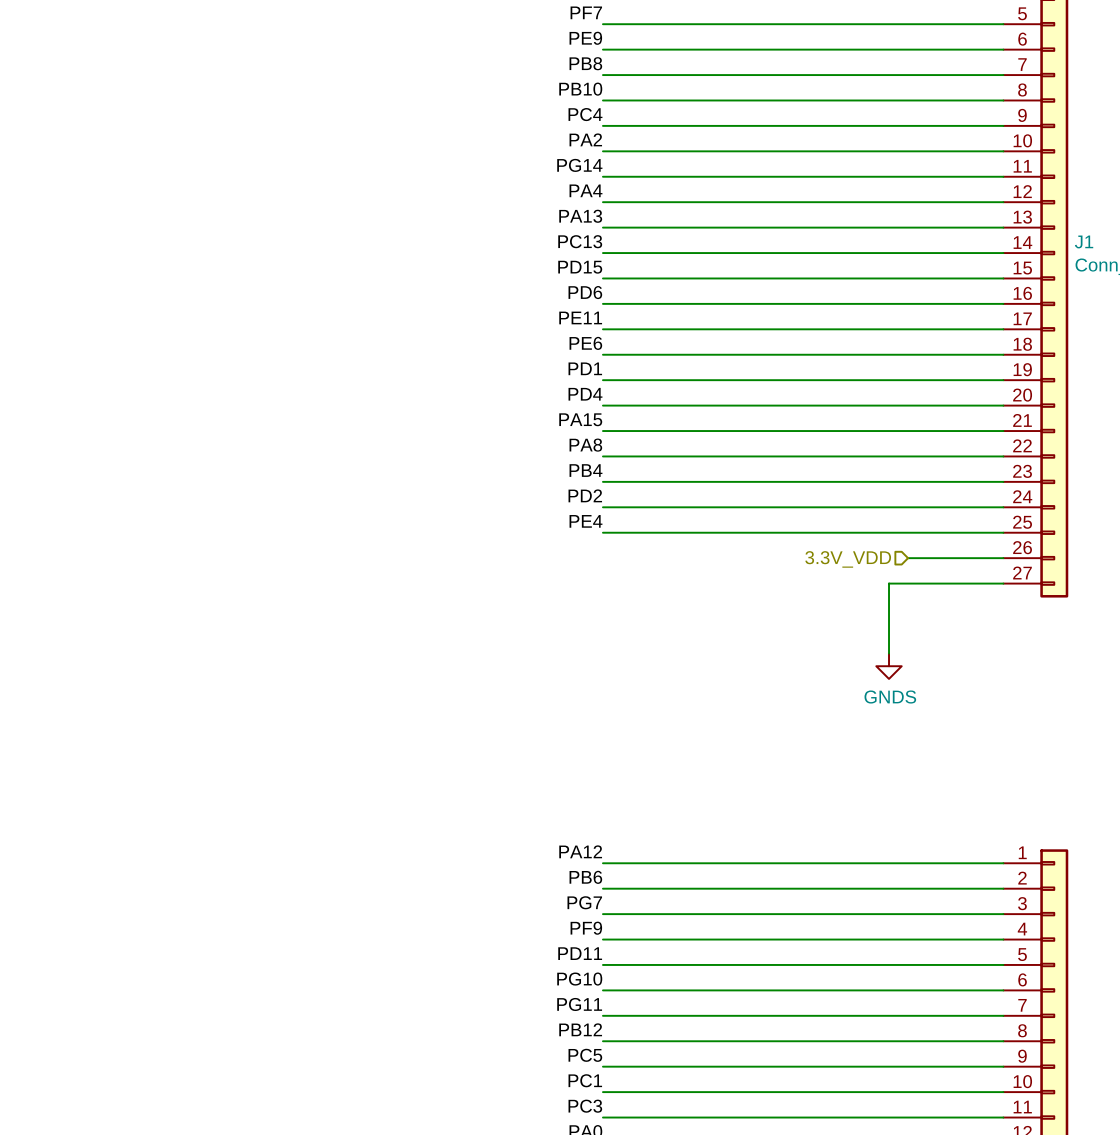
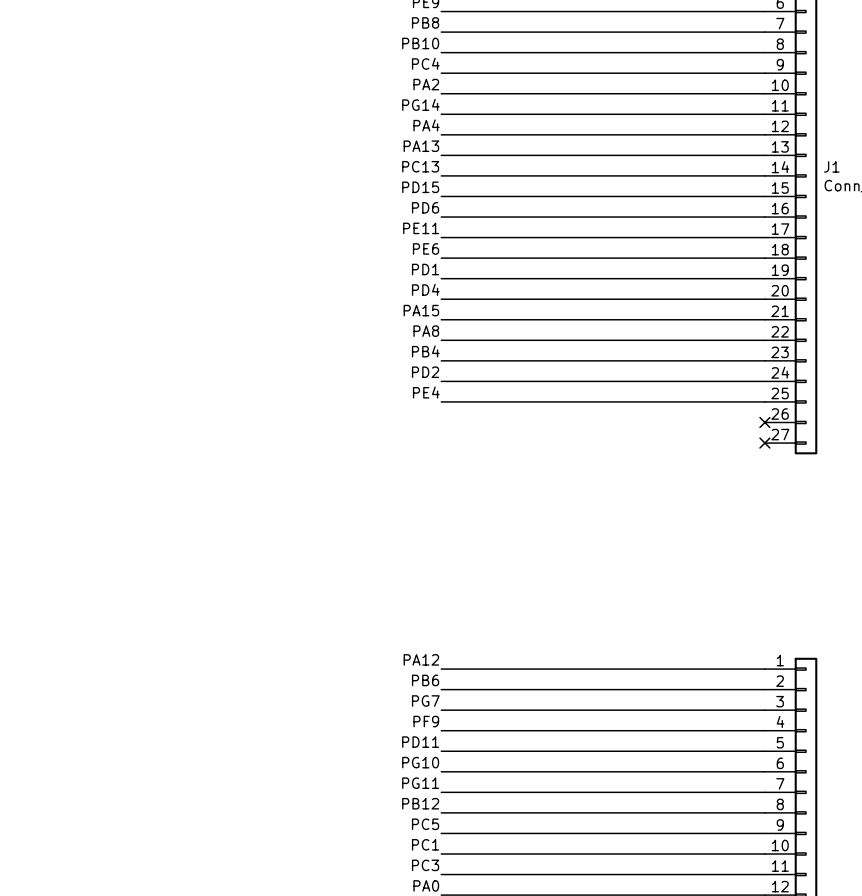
wire: (908, 558) (1003, 558) -> none
no-connect mark: none -> (764, 422)
hierarchical label: 3.3V_VDD (848, 559) -> none
wire: (1003, 583) (889, 583) (889, 653) -> none
no-connect mark: none -> (764, 443)
power symbol: GNDS (889, 666) -> none

